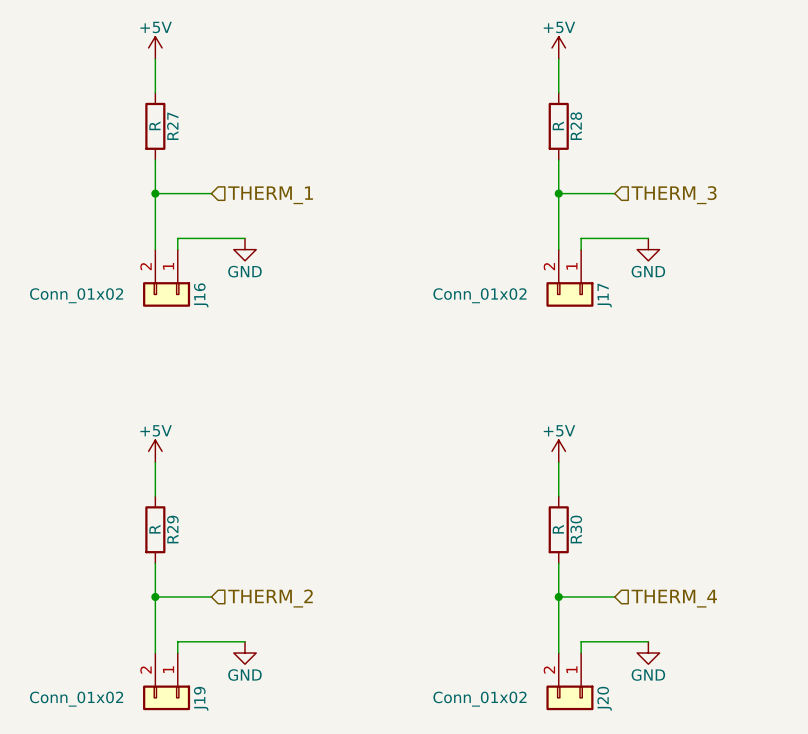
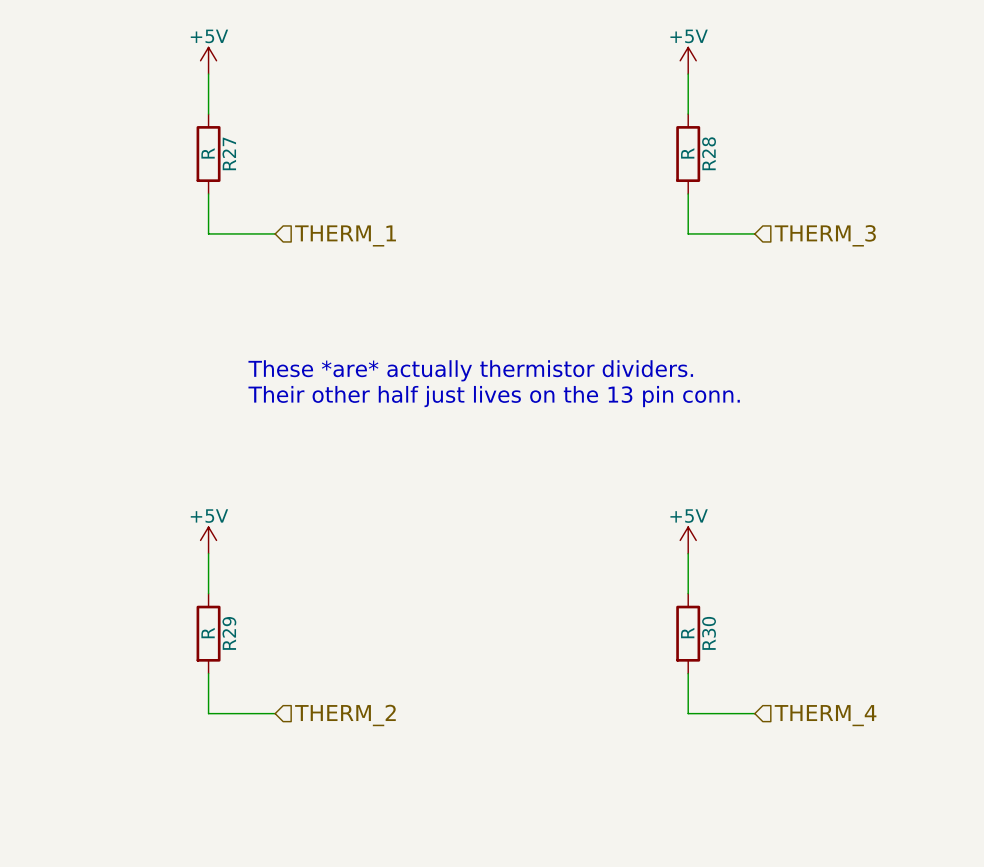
wire: (155, 193) (155, 249) -> none
junction: (155, 193) -> none
wire: (558, 193) (558, 249) -> none
junction: (558, 193) -> none
wire: (245, 238) (177, 238) (177, 249) -> none
wire: (648, 238) (581, 238) (581, 249) -> none
power symbol: GND (245, 249) -> none
power symbol: GND (648, 249) -> none
J16: Conn_01x02 (166, 278) -> none
J17: Conn_01x02 (569, 278) -> none
text: none -> These *are* actually thermistor dividers. (470, 370)
text: none -> Their other half just lives on the 13 pin conn. (494, 396)
wire: (155, 596) (155, 653) -> none
junction: (155, 596) -> none
wire: (558, 596) (558, 653) -> none
junction: (558, 596) -> none
wire: (245, 641) (177, 641) (177, 653) -> none
wire: (648, 641) (581, 641) (581, 653) -> none
power symbol: GND (245, 653) -> none
power symbol: GND (648, 653) -> none
J19: Conn_01x02 (166, 681) -> none
J20: Conn_01x02 (569, 681) -> none

